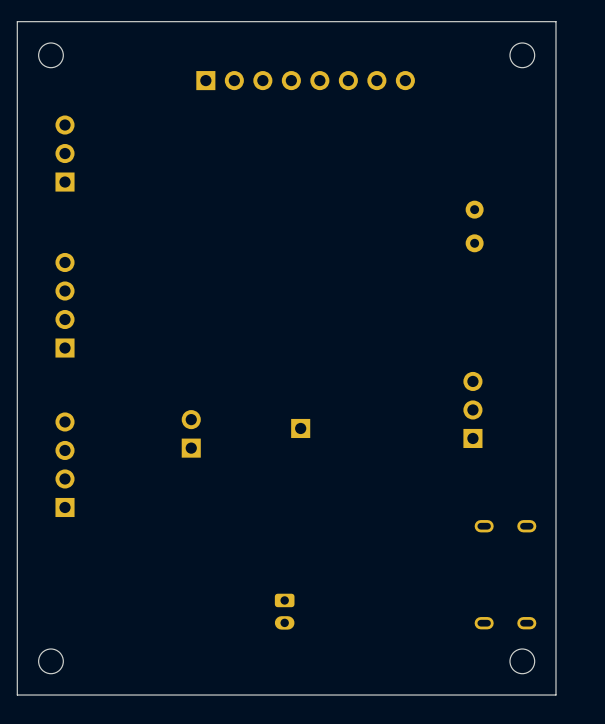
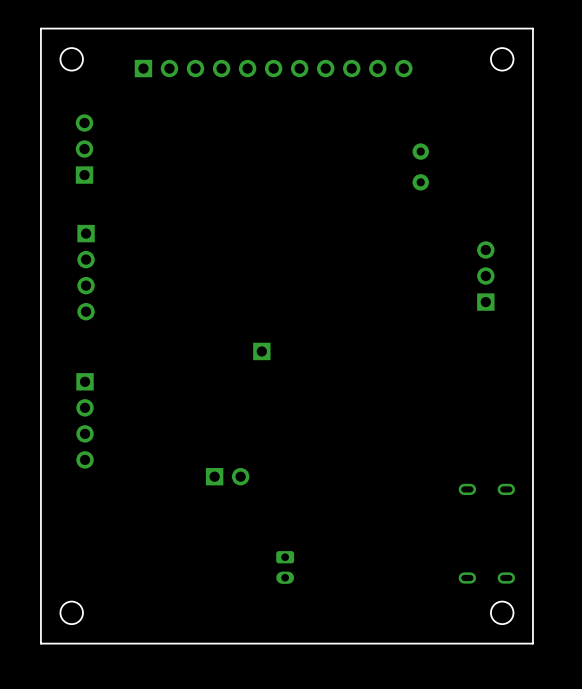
part: none -> (273, 68)
part: (305, 80) -> none
part position: (474, 226) -> (420, 166)
part rotation: 0° (65, 305) -> 180° (86, 272)
part position: (472, 409) -> (485, 276)
part position: (300, 428) -> (261, 351)
part rotation: 0° (191, 433) -> 90° clockwise (227, 476)
part position: (191, 433) -> (227, 476)
part rotation: 0° (65, 464) -> 180° (85, 420)

